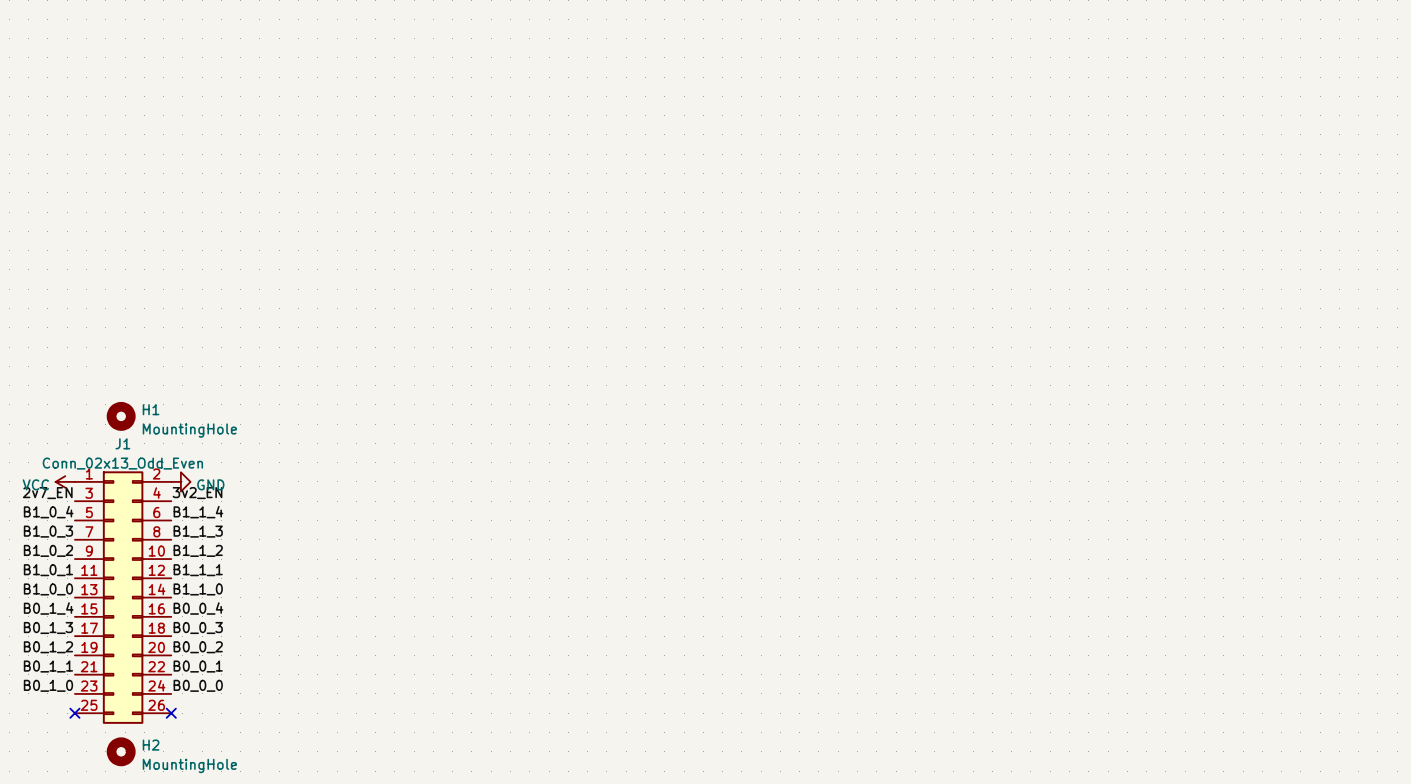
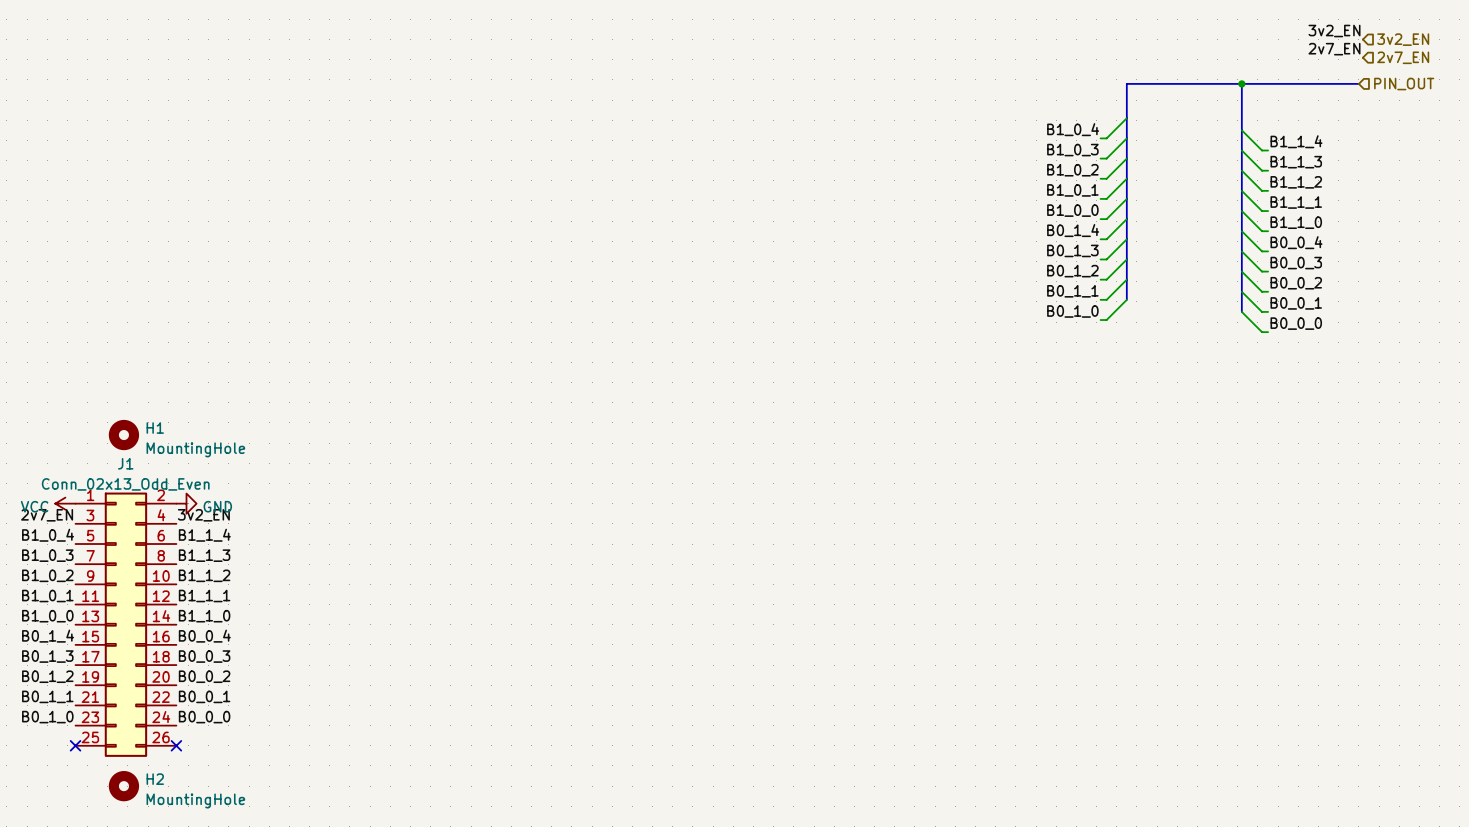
label: none -> 3v2_EN (1334, 31)
hierarchical label: none -> 3v2_EN (1403, 39)
label: none -> 2v7_EN (1334, 49)
hierarchical label: none -> 2v7_EN (1403, 57)
bus: none -> (1241, 83) (1241, 311)
junction: none -> (1241, 83)
bus: none -> (1358, 83) (1126, 83) (1126, 299)
hierarchical label: none -> PIN_OUT (1404, 84)
wire: none -> (1126, 118) (1106, 138) (1100, 138)
label: none -> B1_0_4 (1073, 129)
wire: none -> (1241, 130) (1262, 150) (1268, 150)
wire: none -> (1126, 138) (1106, 158) (1100, 158)
label: none -> B1_1_4 (1296, 141)
label: none -> B1_0_3 (1072, 150)
wire: none -> (1241, 150) (1262, 170) (1268, 170)
wire: none -> (1126, 158) (1106, 178) (1100, 178)
label: none -> B1_1_3 (1296, 162)
label: none -> B1_0_2 (1072, 170)
wire: none -> (1241, 170) (1262, 190) (1268, 190)
wire: none -> (1126, 178) (1106, 198) (1100, 198)
label: none -> B1_1_2 (1296, 182)
label: none -> B1_0_1 (1072, 190)
wire: none -> (1241, 190) (1262, 211) (1268, 211)
wire: none -> (1126, 198) (1106, 219) (1100, 219)
label: none -> B1_1_1 (1296, 202)
label: none -> B1_0_0 (1072, 210)
wire: none -> (1241, 211) (1262, 231) (1268, 231)
wire: none -> (1126, 219) (1106, 239) (1100, 239)
label: none -> B1_1_0 (1296, 222)
label: none -> B0_1_4 (1073, 230)
wire: none -> (1241, 231) (1262, 251) (1268, 251)
wire: none -> (1126, 239) (1106, 259) (1100, 259)
label: none -> B0_0_4 (1296, 242)
label: none -> B0_1_3 (1072, 250)
wire: none -> (1241, 251) (1262, 271) (1268, 271)
wire: none -> (1126, 259) (1106, 279) (1100, 279)
label: none -> B0_0_3 (1296, 263)
label: none -> B0_1_2 (1072, 271)
wire: none -> (1241, 271) (1262, 291) (1268, 291)
wire: none -> (1126, 279) (1106, 299) (1100, 299)
label: none -> B0_0_2 (1296, 283)
label: none -> B0_1_1 (1072, 291)
wire: none -> (1241, 291) (1262, 311) (1268, 311)
wire: none -> (1126, 299) (1106, 320) (1100, 320)
label: none -> B0_0_1 (1296, 303)
label: none -> B0_1_0 (1072, 311)
wire: none -> (1241, 311) (1262, 332) (1268, 332)
label: none -> B0_0_0 (1296, 323)

